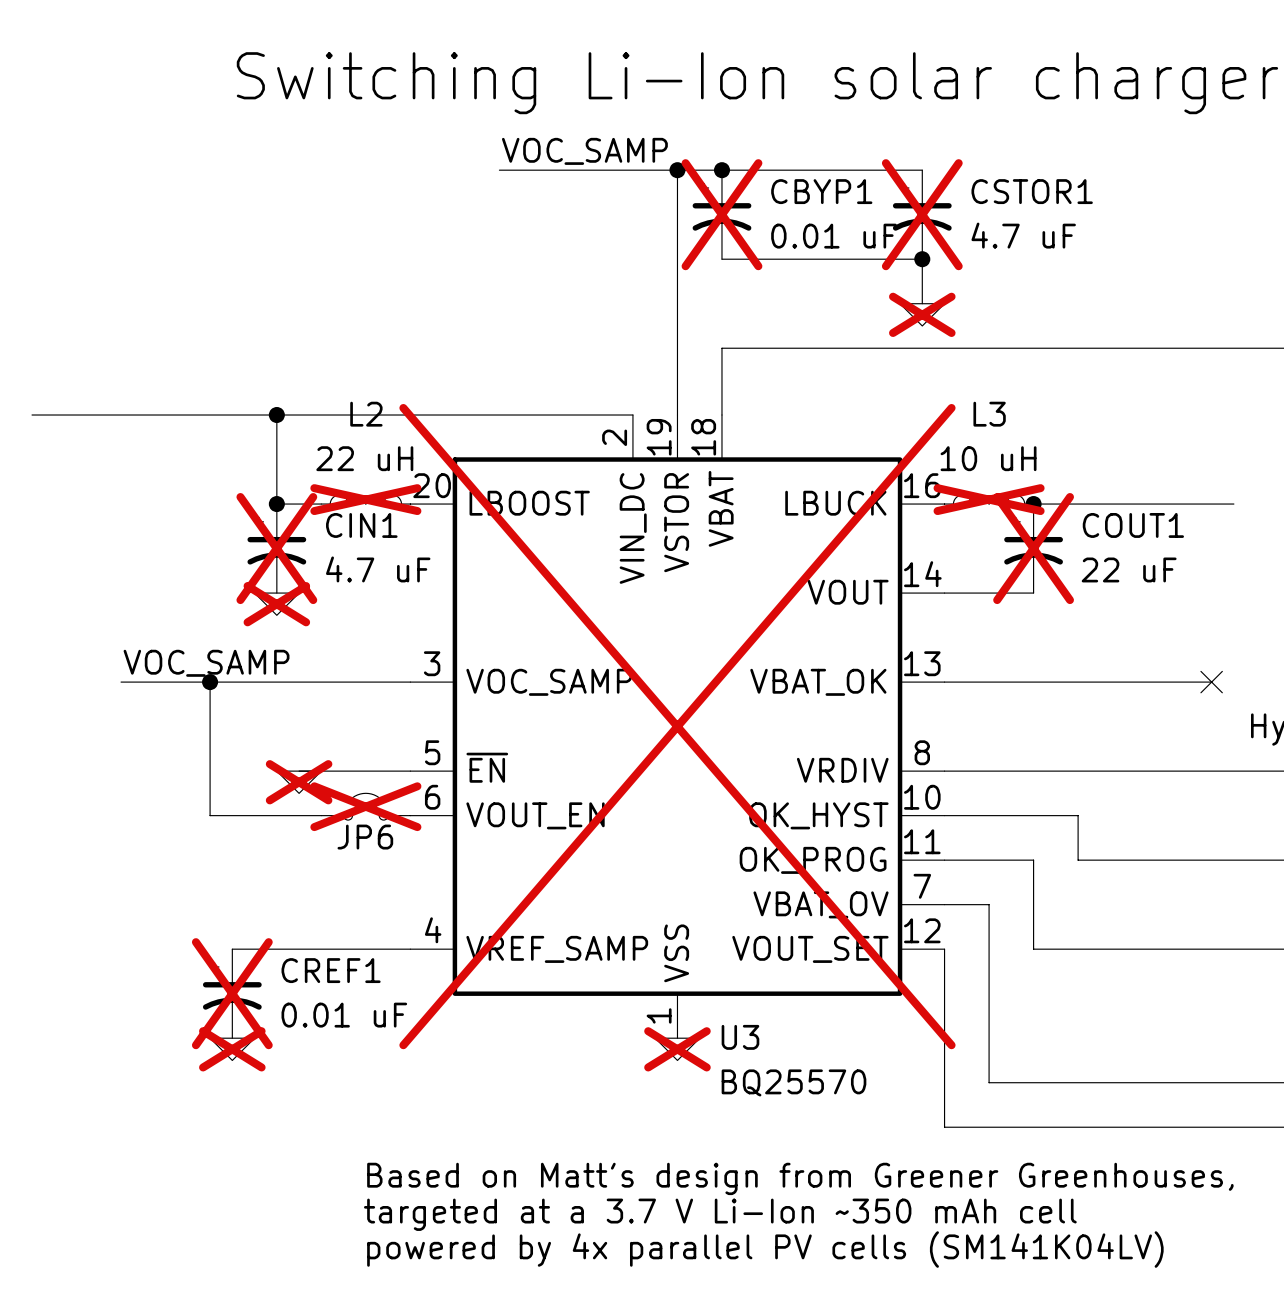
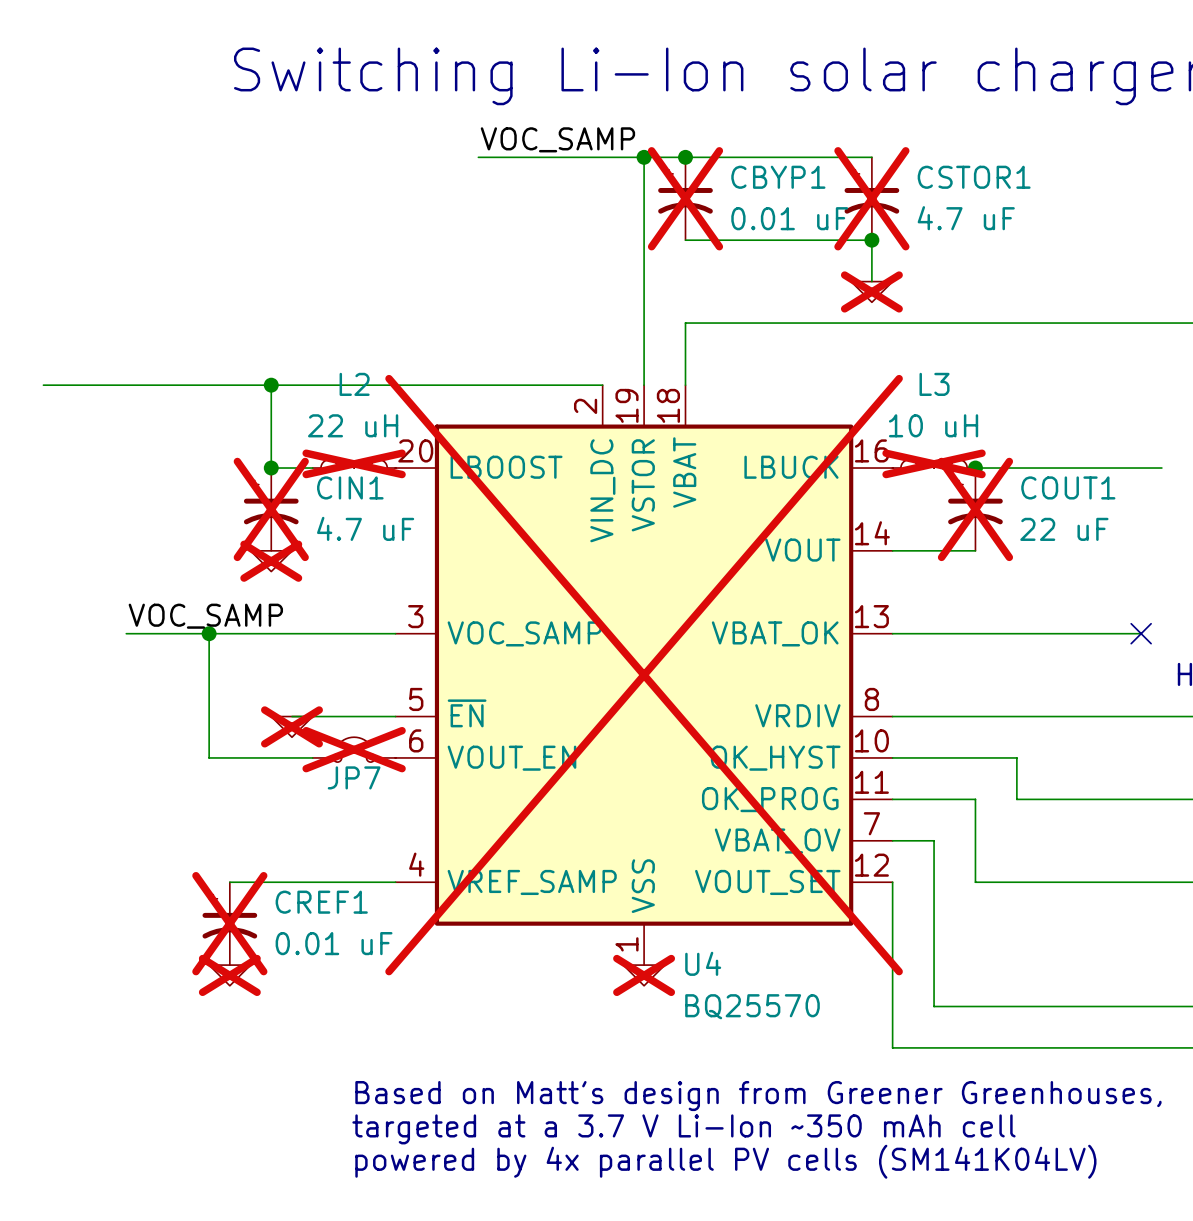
JP6 name: JP6 (365, 837) -> JP7 (354, 777)
U3 name: U3 (740, 1037) -> U4 (703, 963)

